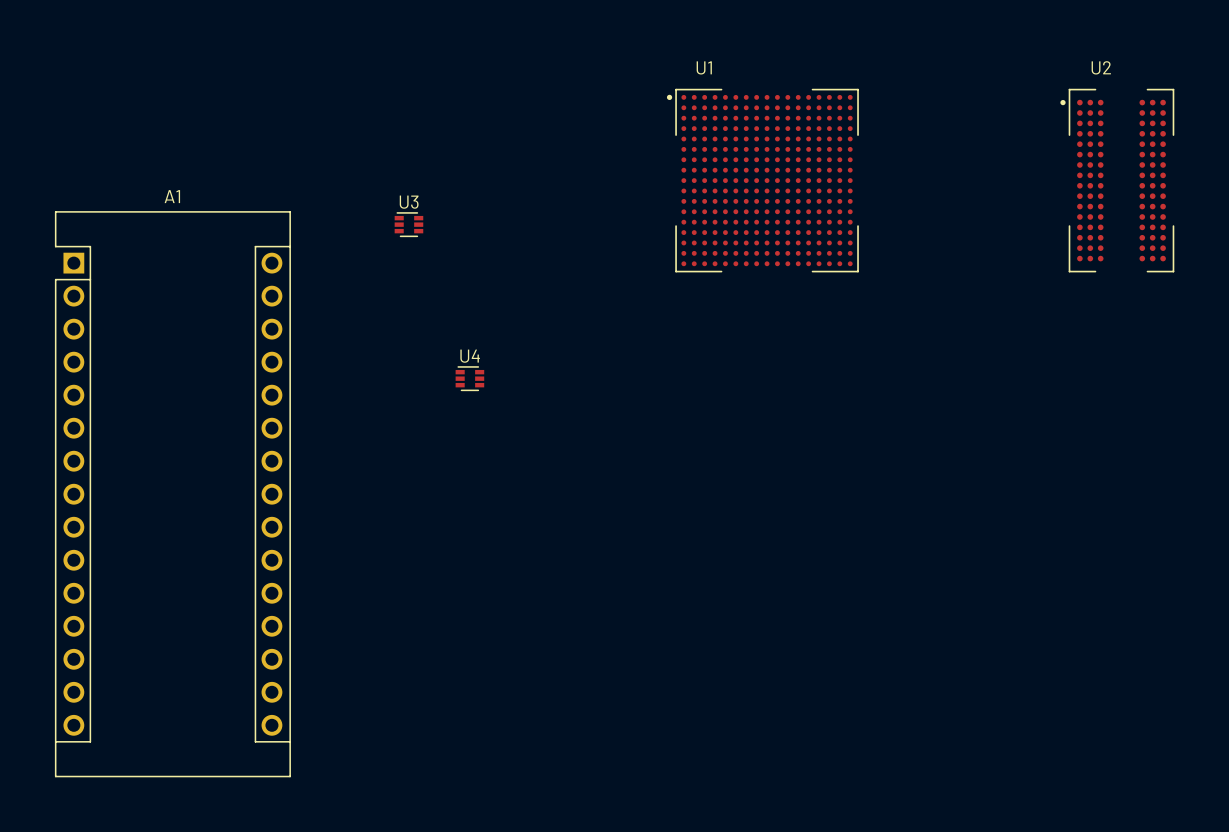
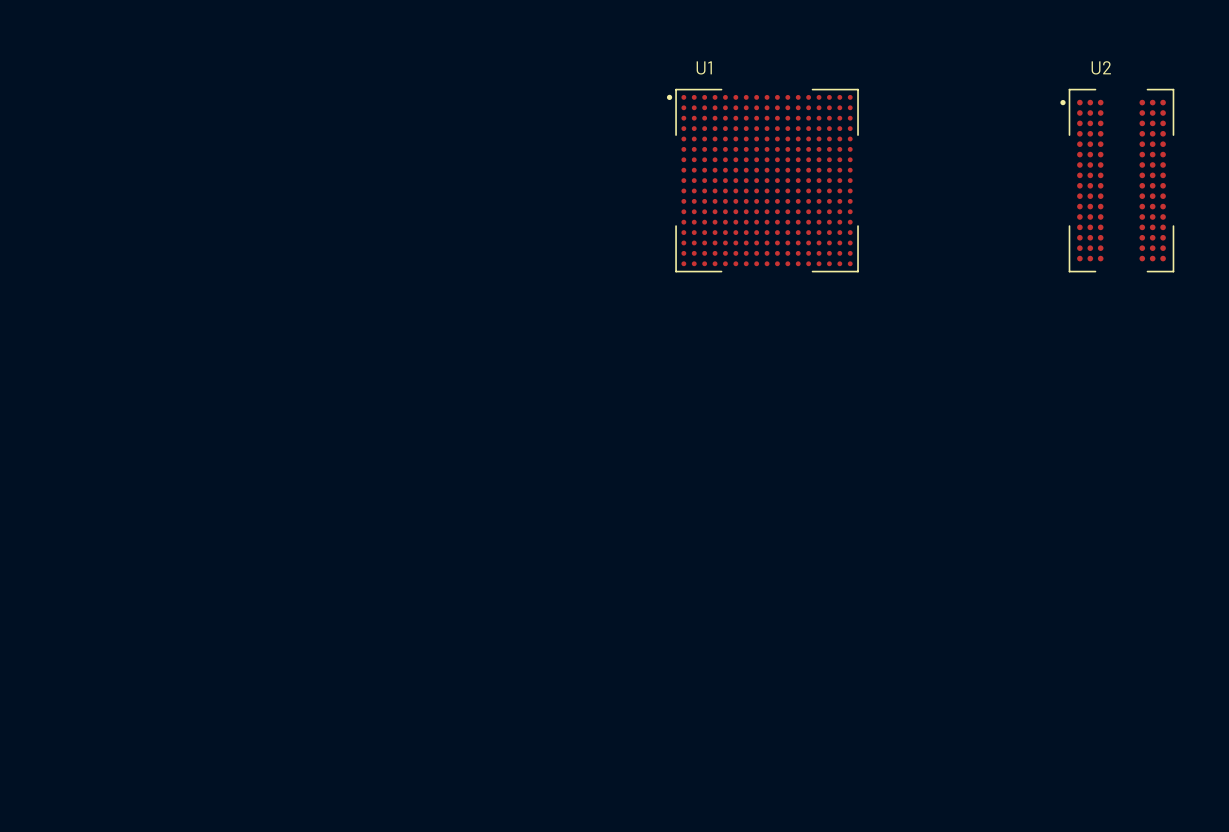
U3: (408, 224) -> none
U4: (469, 378) -> none
A1: (172, 494) -> none

